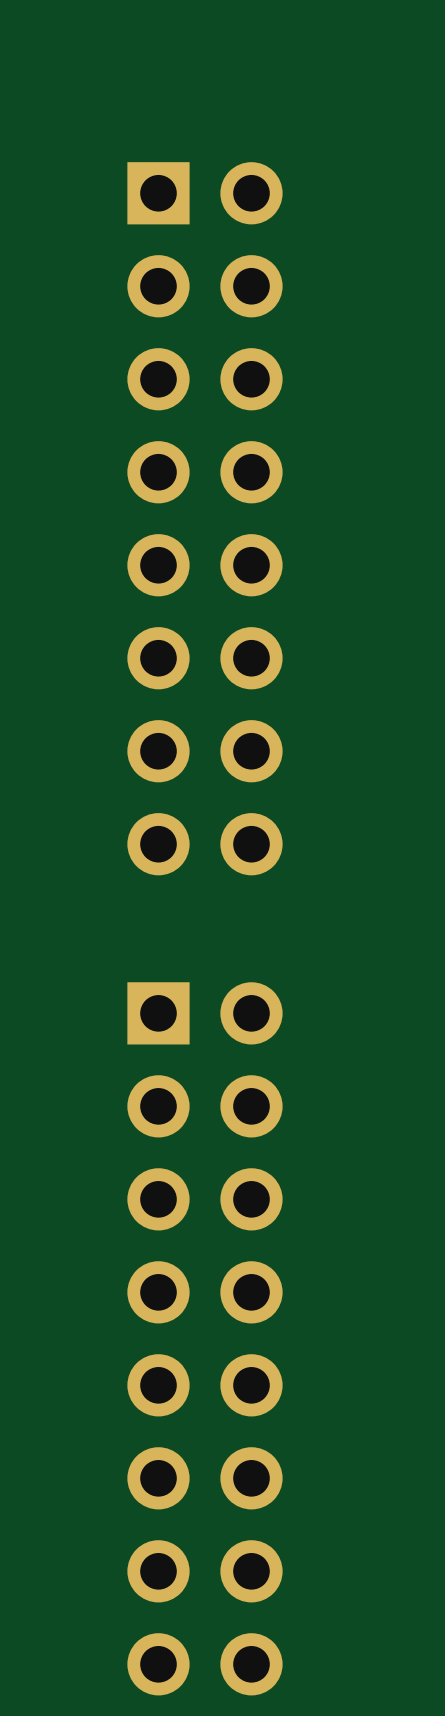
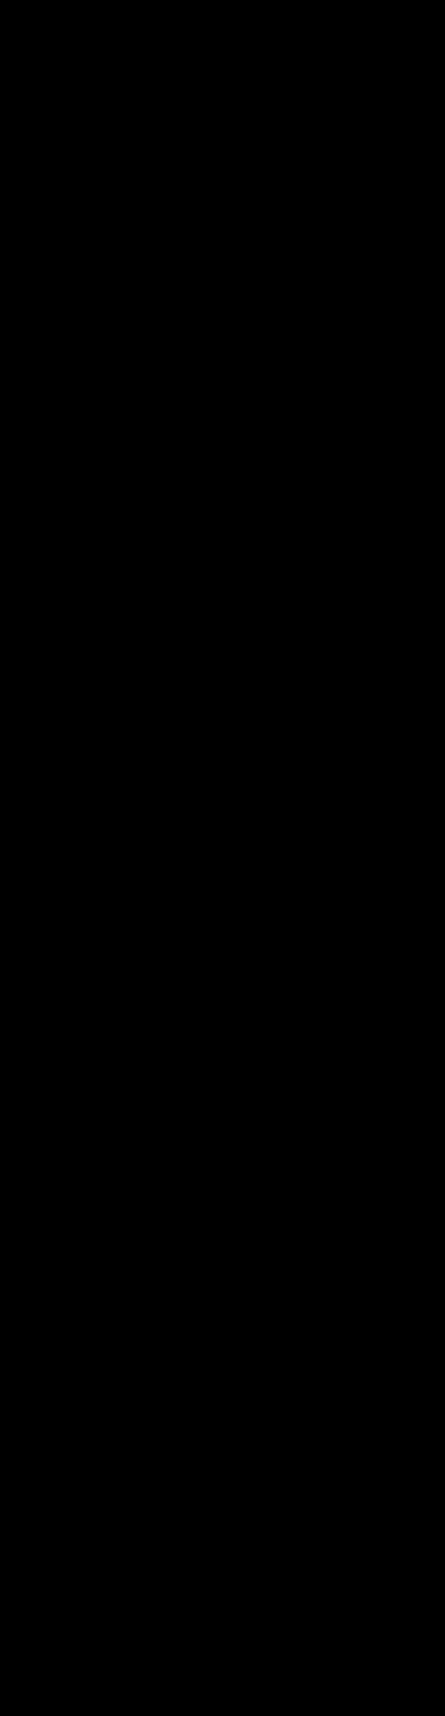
part: (204, 518) -> none
part: (204, 1338) -> none

